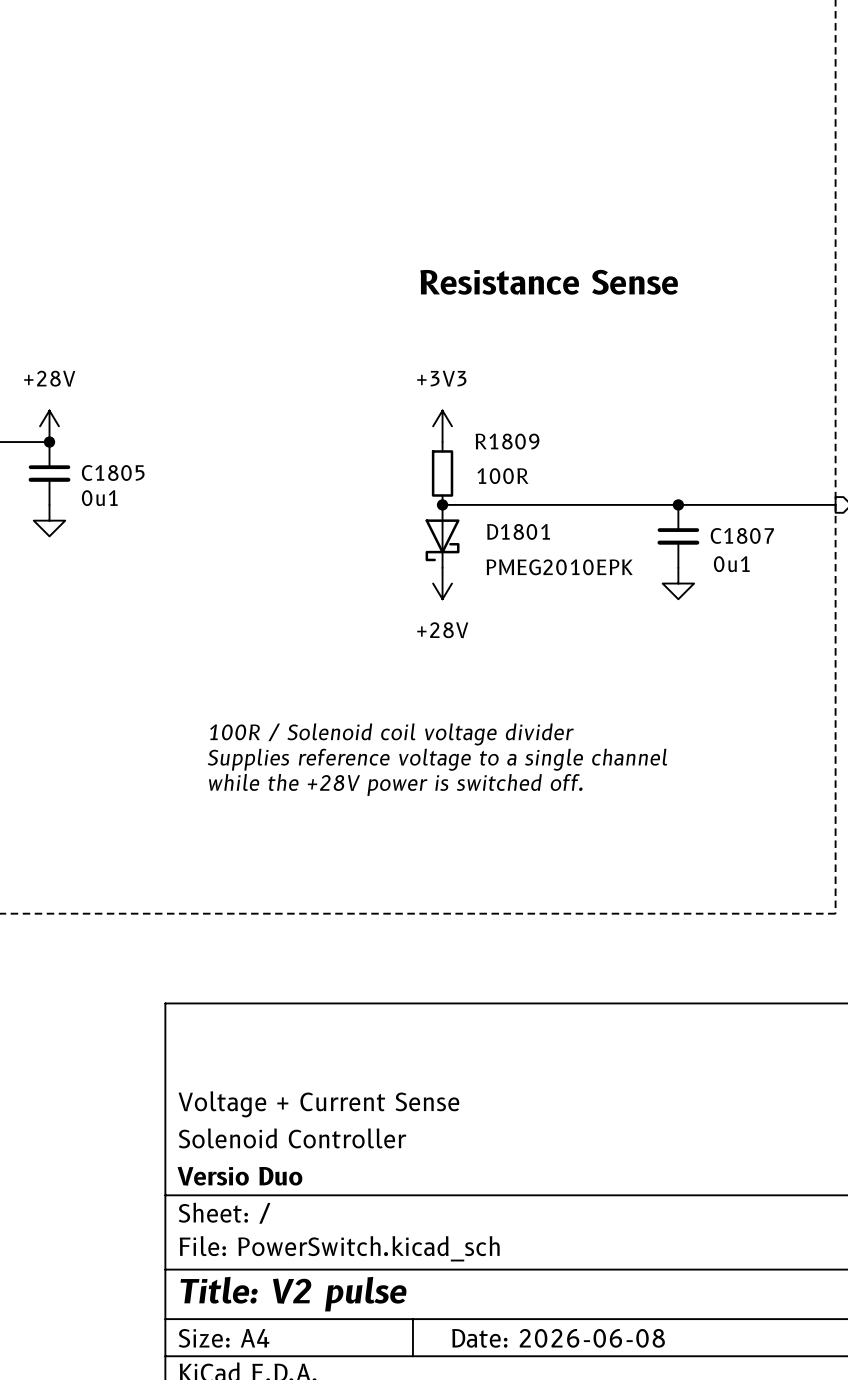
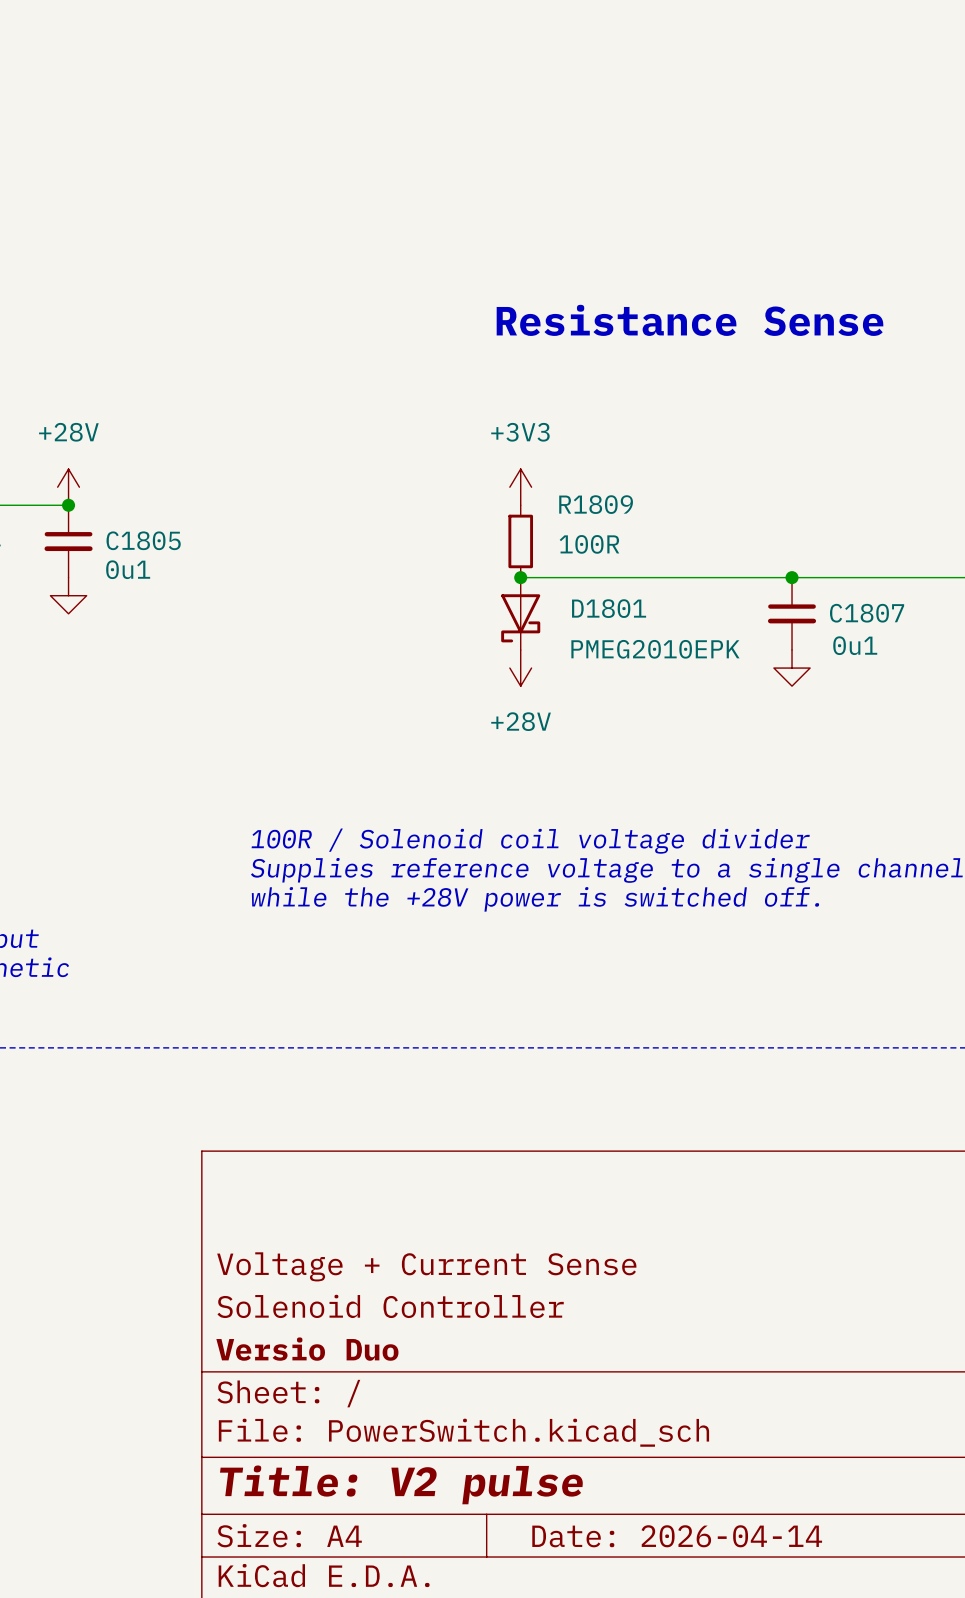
title block: Date: 2026-06-08 (558, 1338) -> Date: 2026-04-14 (677, 1536)

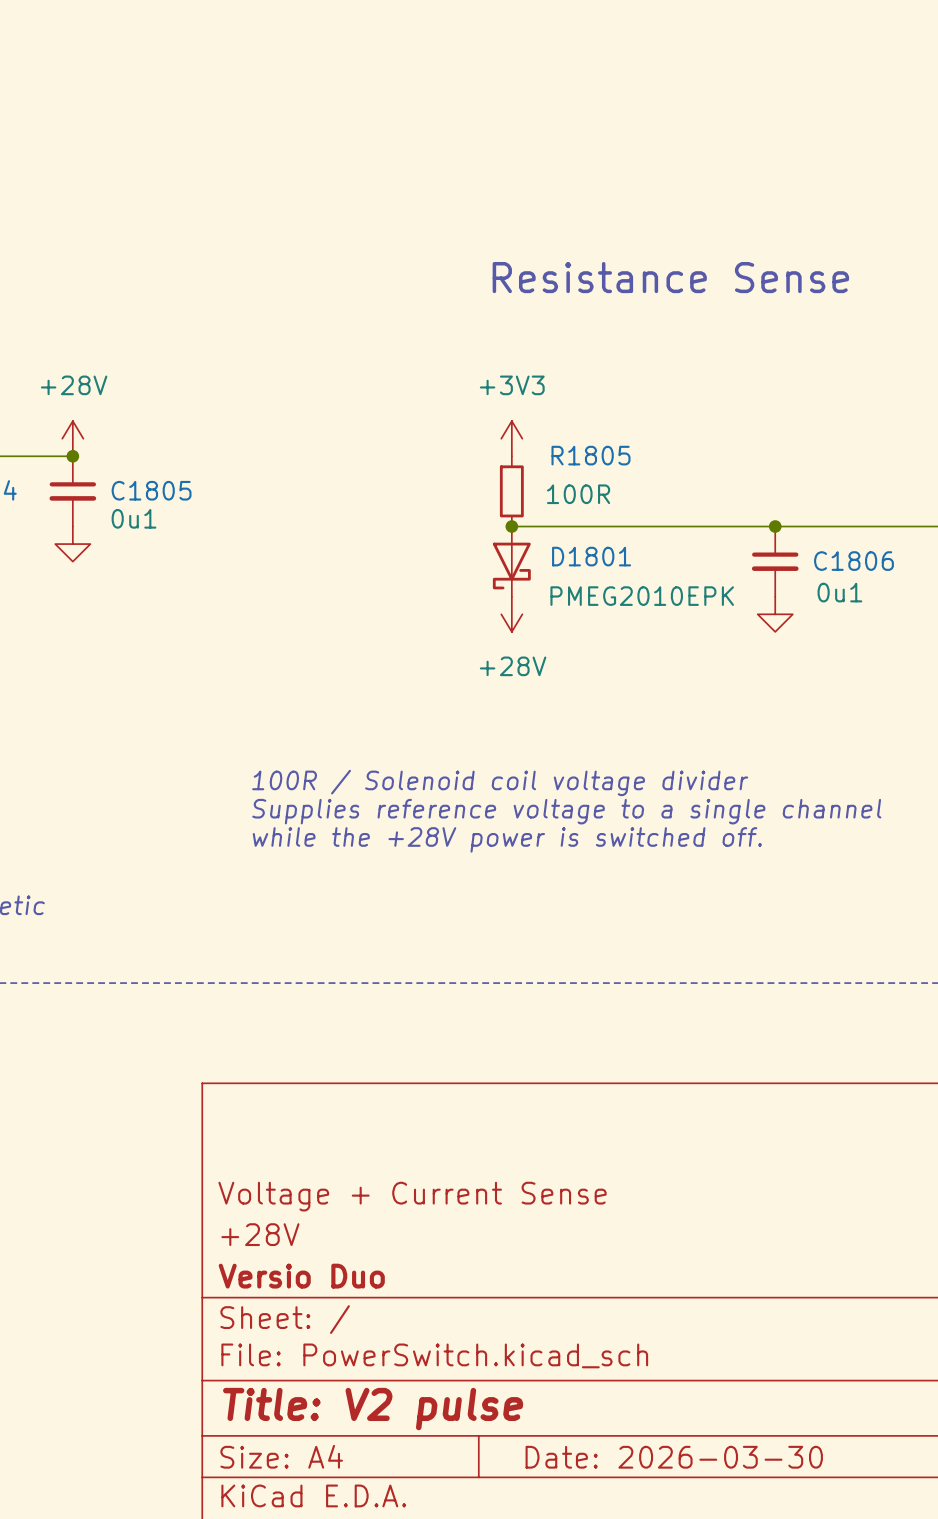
R1809 name: R1809 (596, 504) -> R1805 (590, 455)
C1807 name: C1807 (867, 613) -> C1806 (853, 561)
title block: Solenoid Controller (390, 1306) -> +28V (260, 1234)
title block: Date: 2026-04-14 (677, 1536) -> Date: 2026-03-30 (674, 1457)

